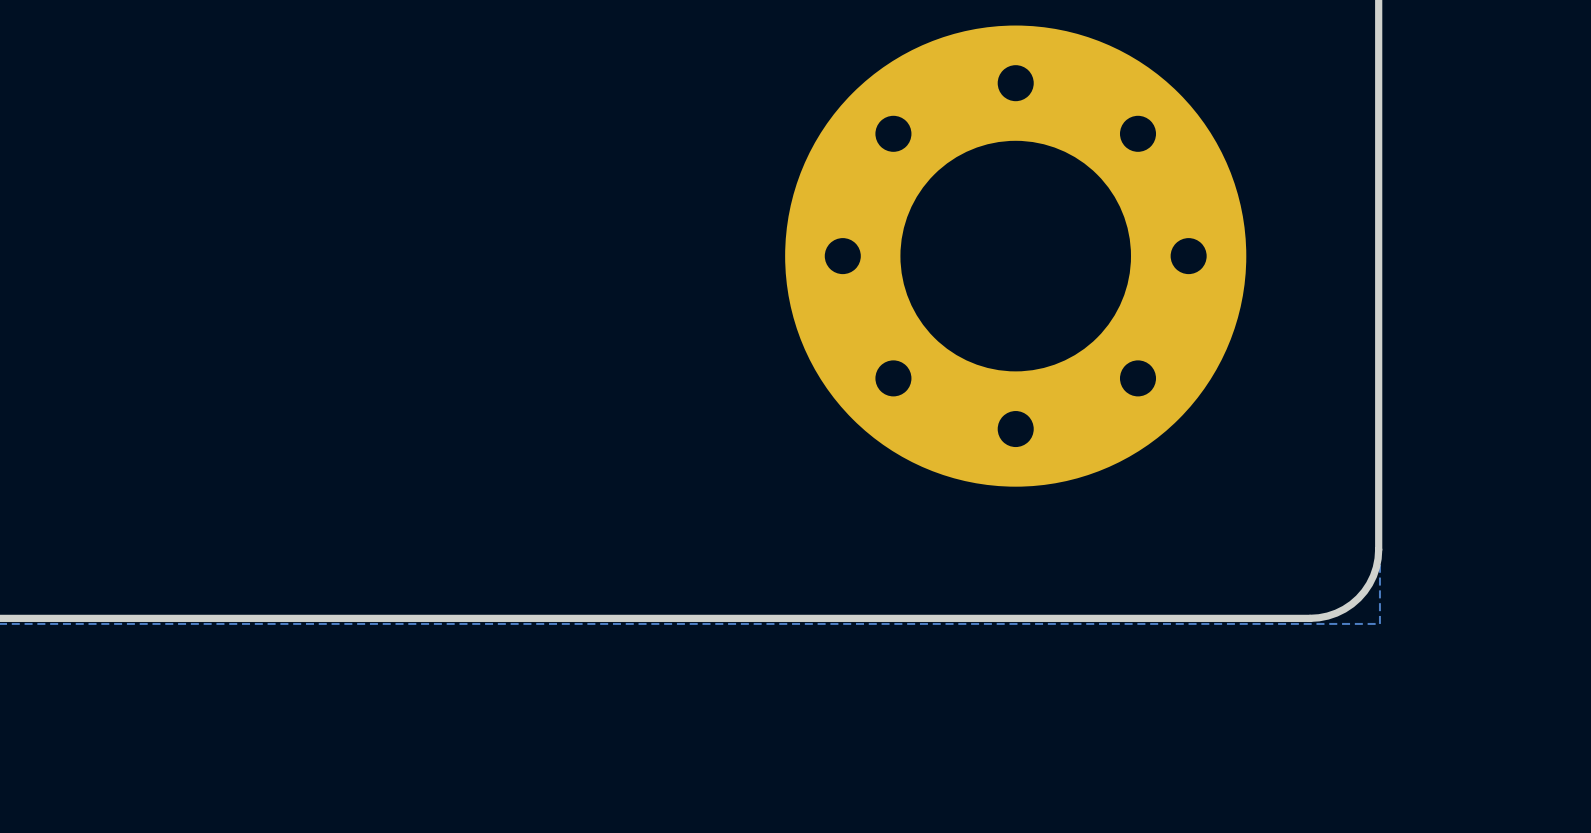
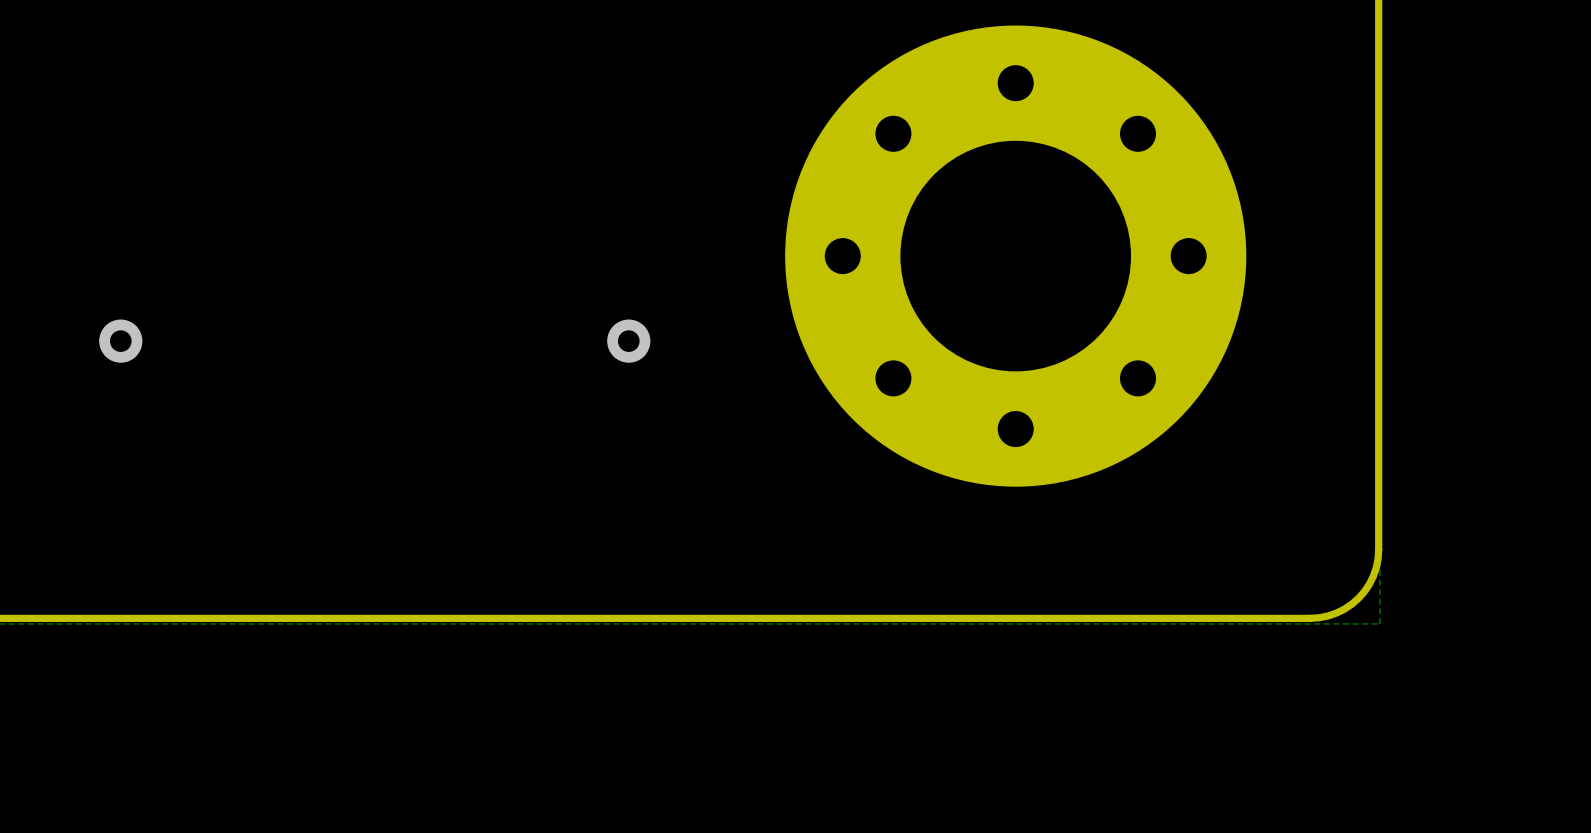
via: none -> (120, 341)
via: none -> (628, 341)

